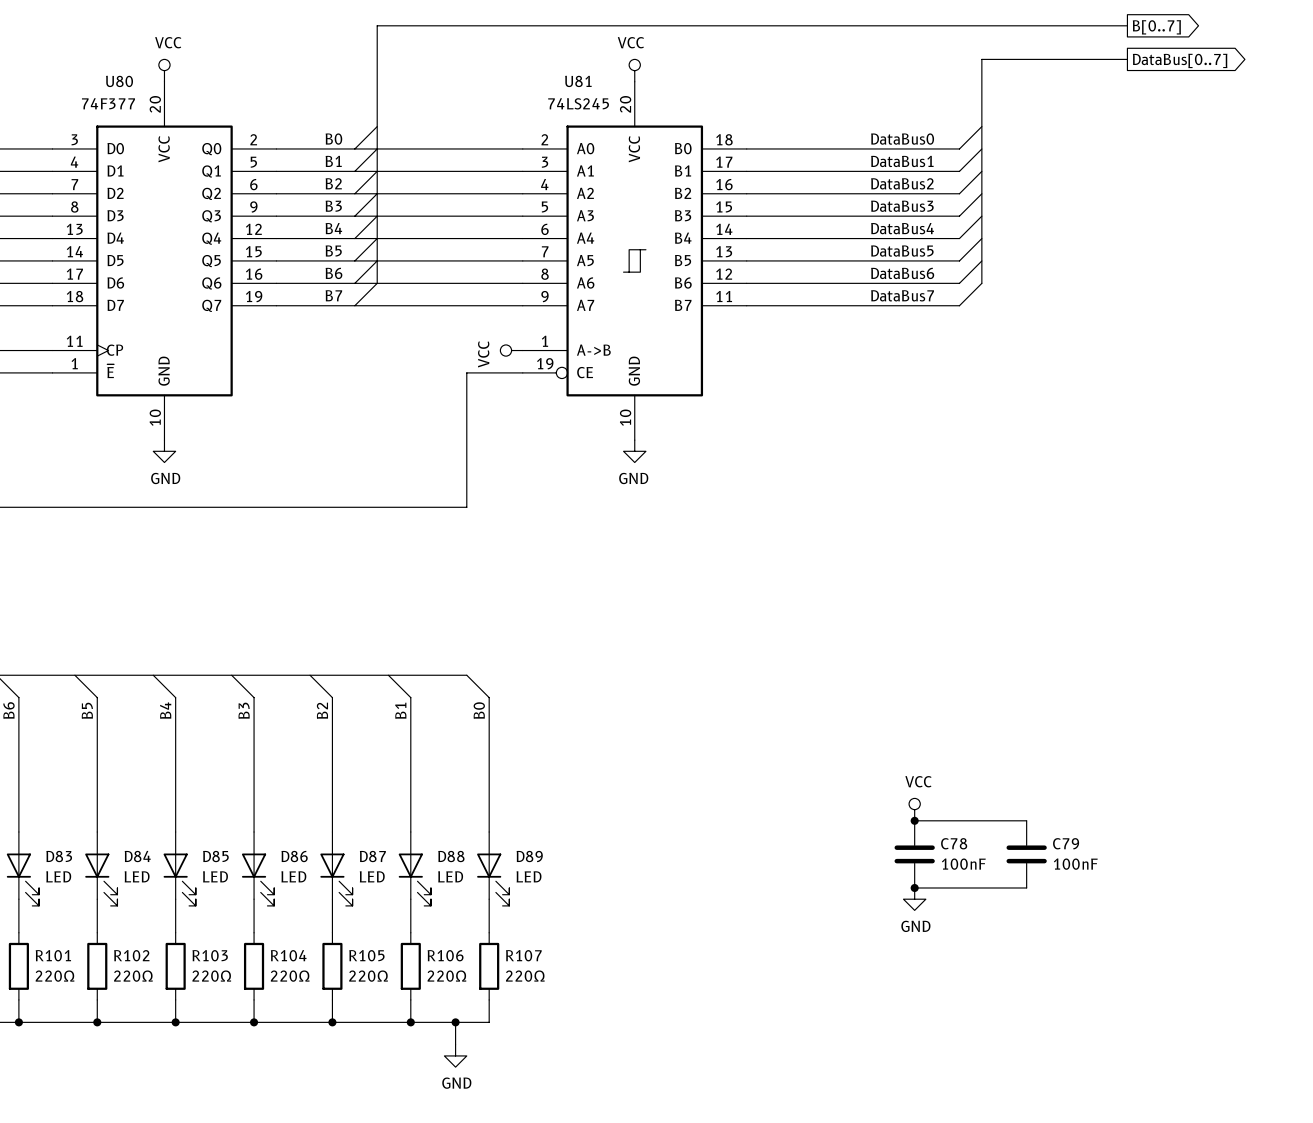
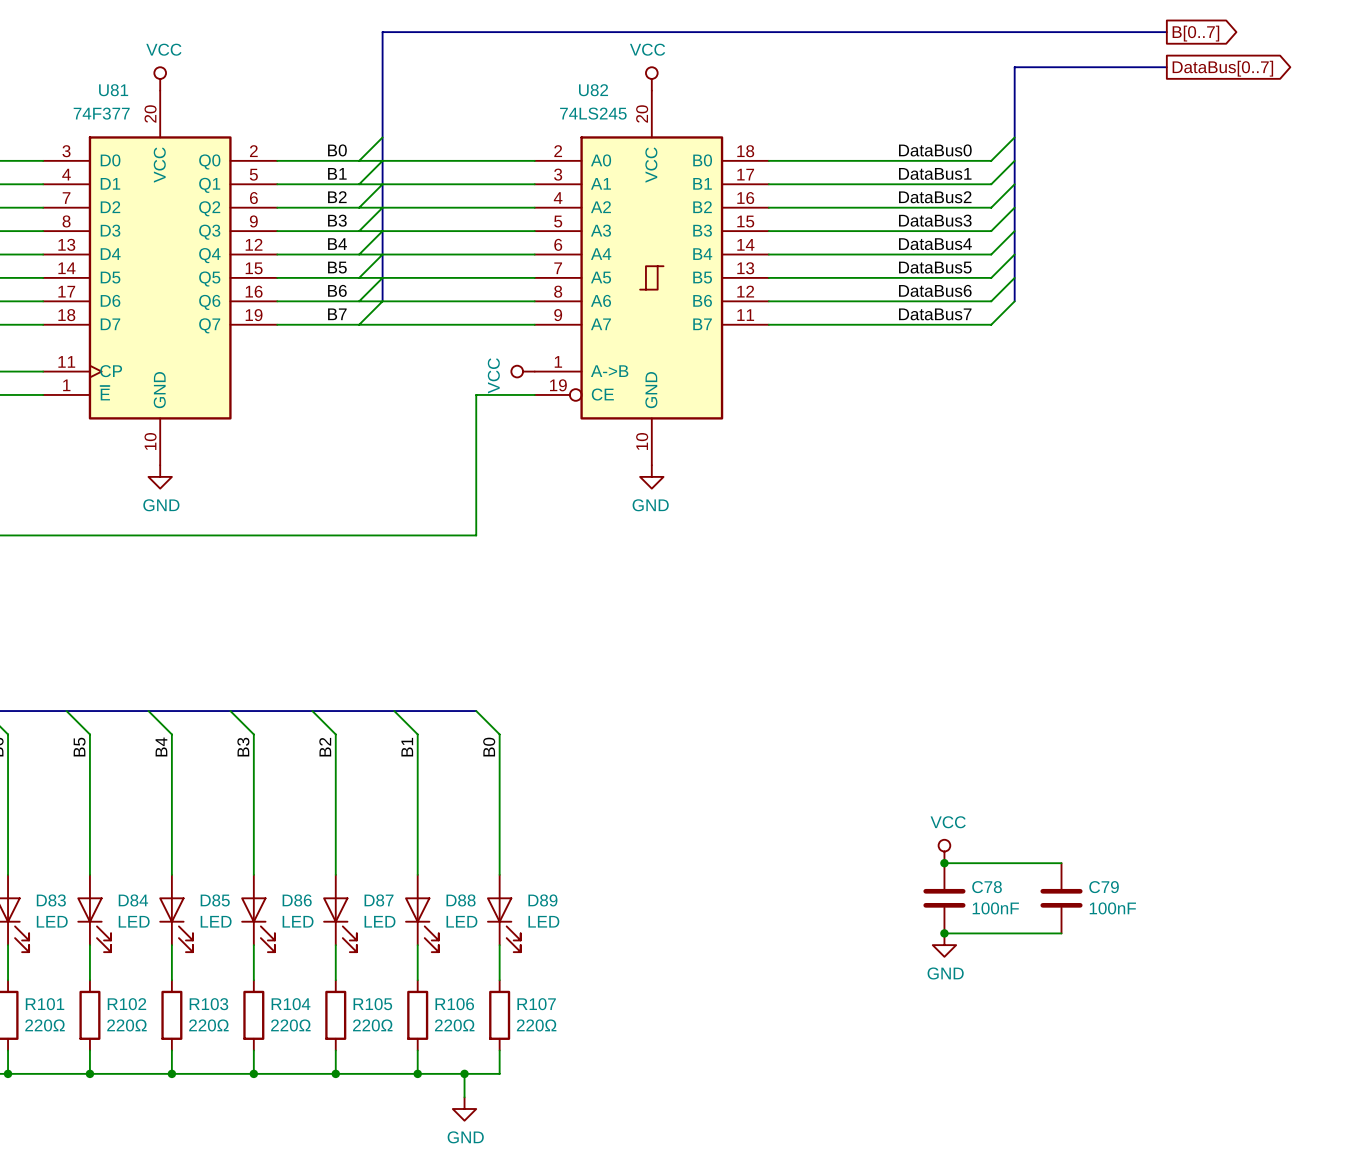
U80 name: U80 (119, 81) -> U81 (113, 90)
U81 name: U81 (578, 81) -> U82 (593, 90)

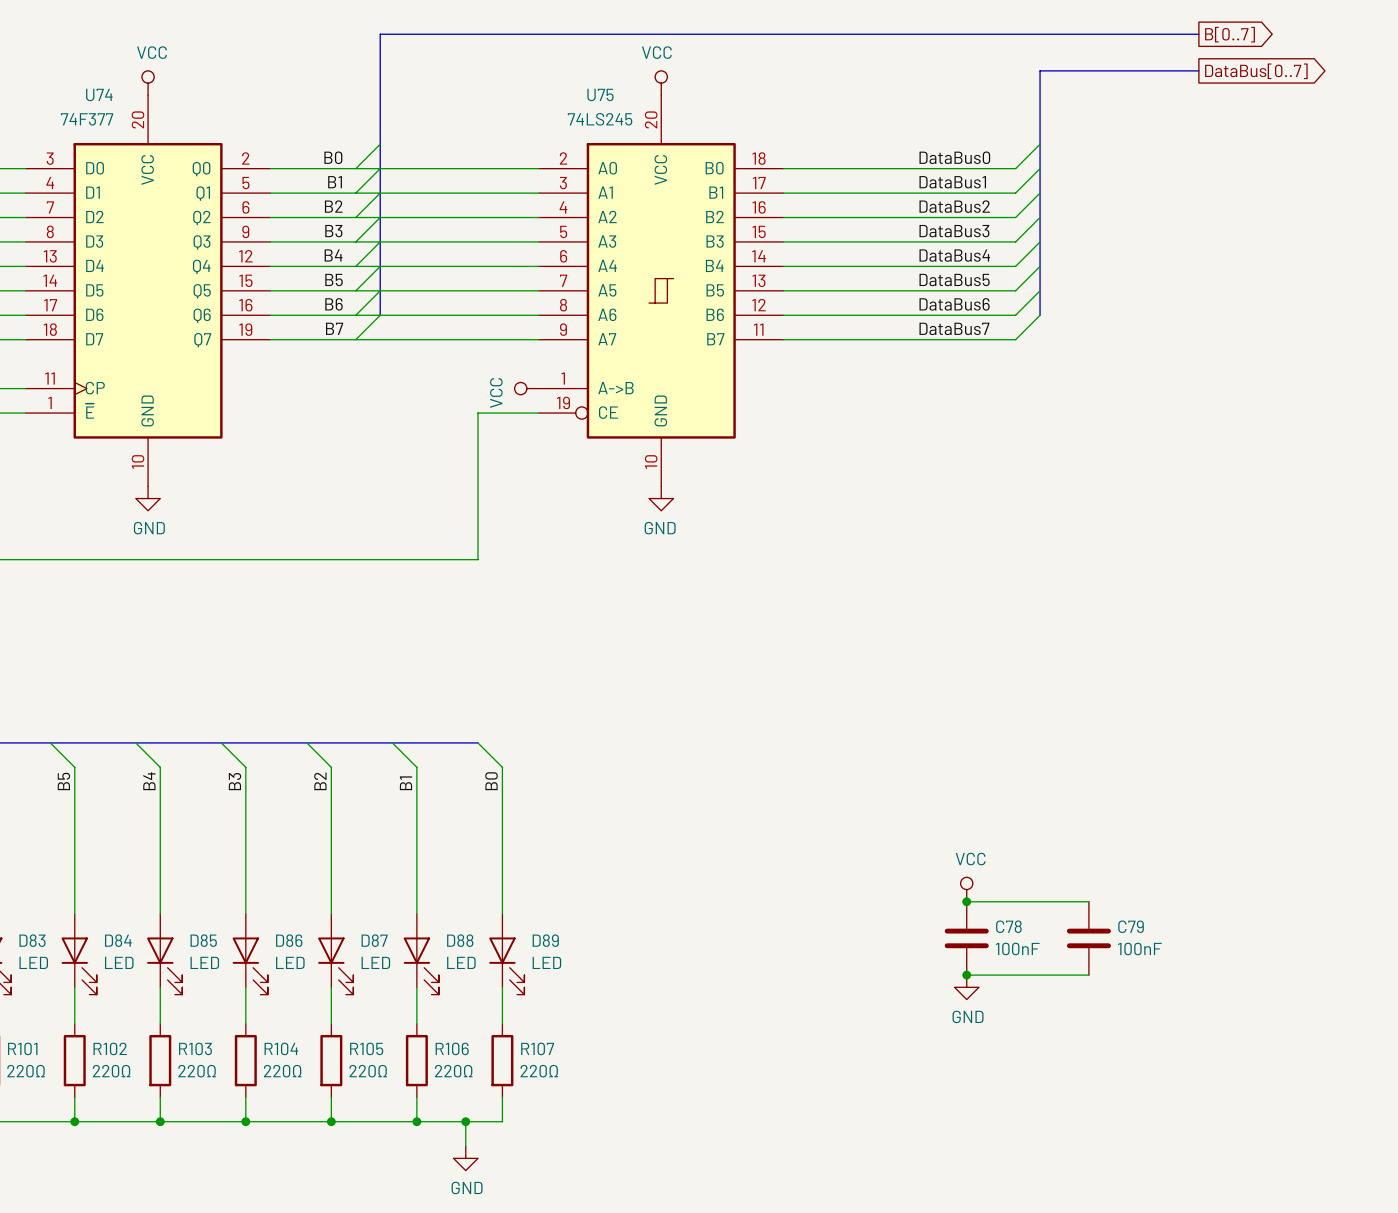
U81 name: U81 (113, 90) -> U74 (99, 94)
U82 name: U82 (593, 90) -> U75 (600, 94)

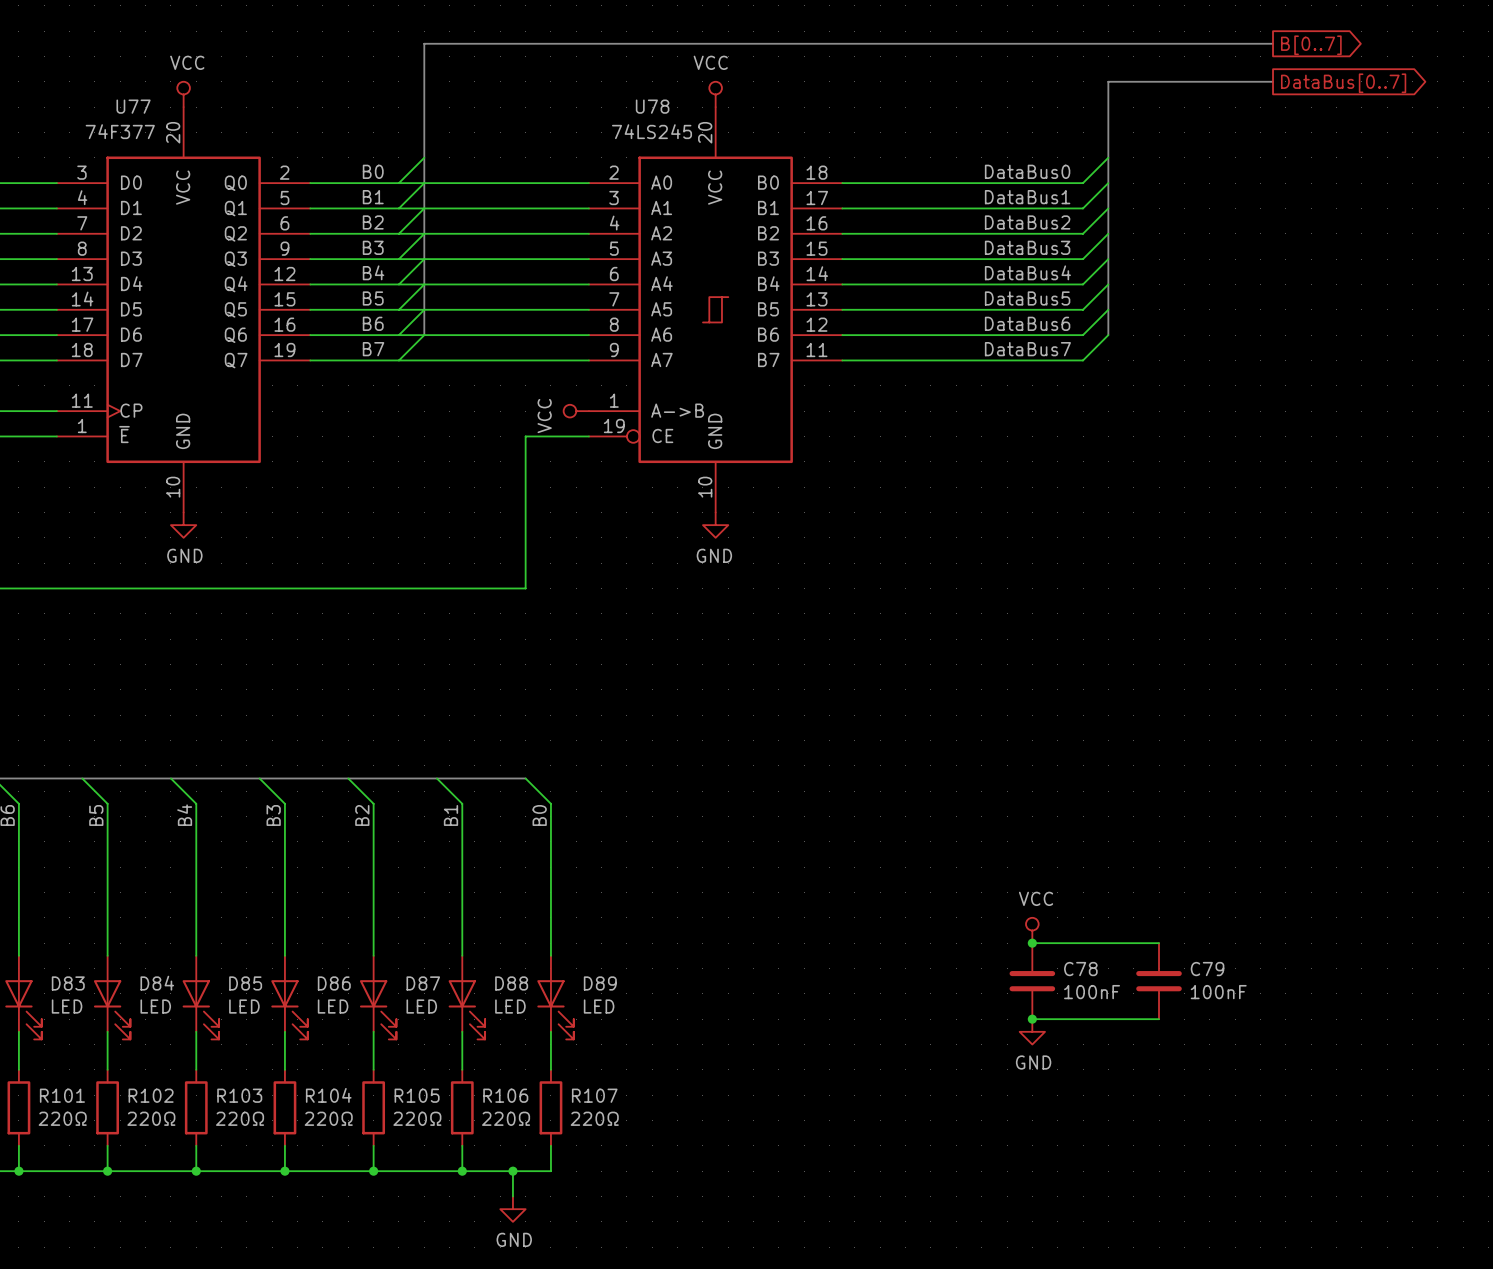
U74 name: U74 (99, 94) -> U77 (133, 106)
U75 name: U75 (600, 94) -> U78 (652, 106)

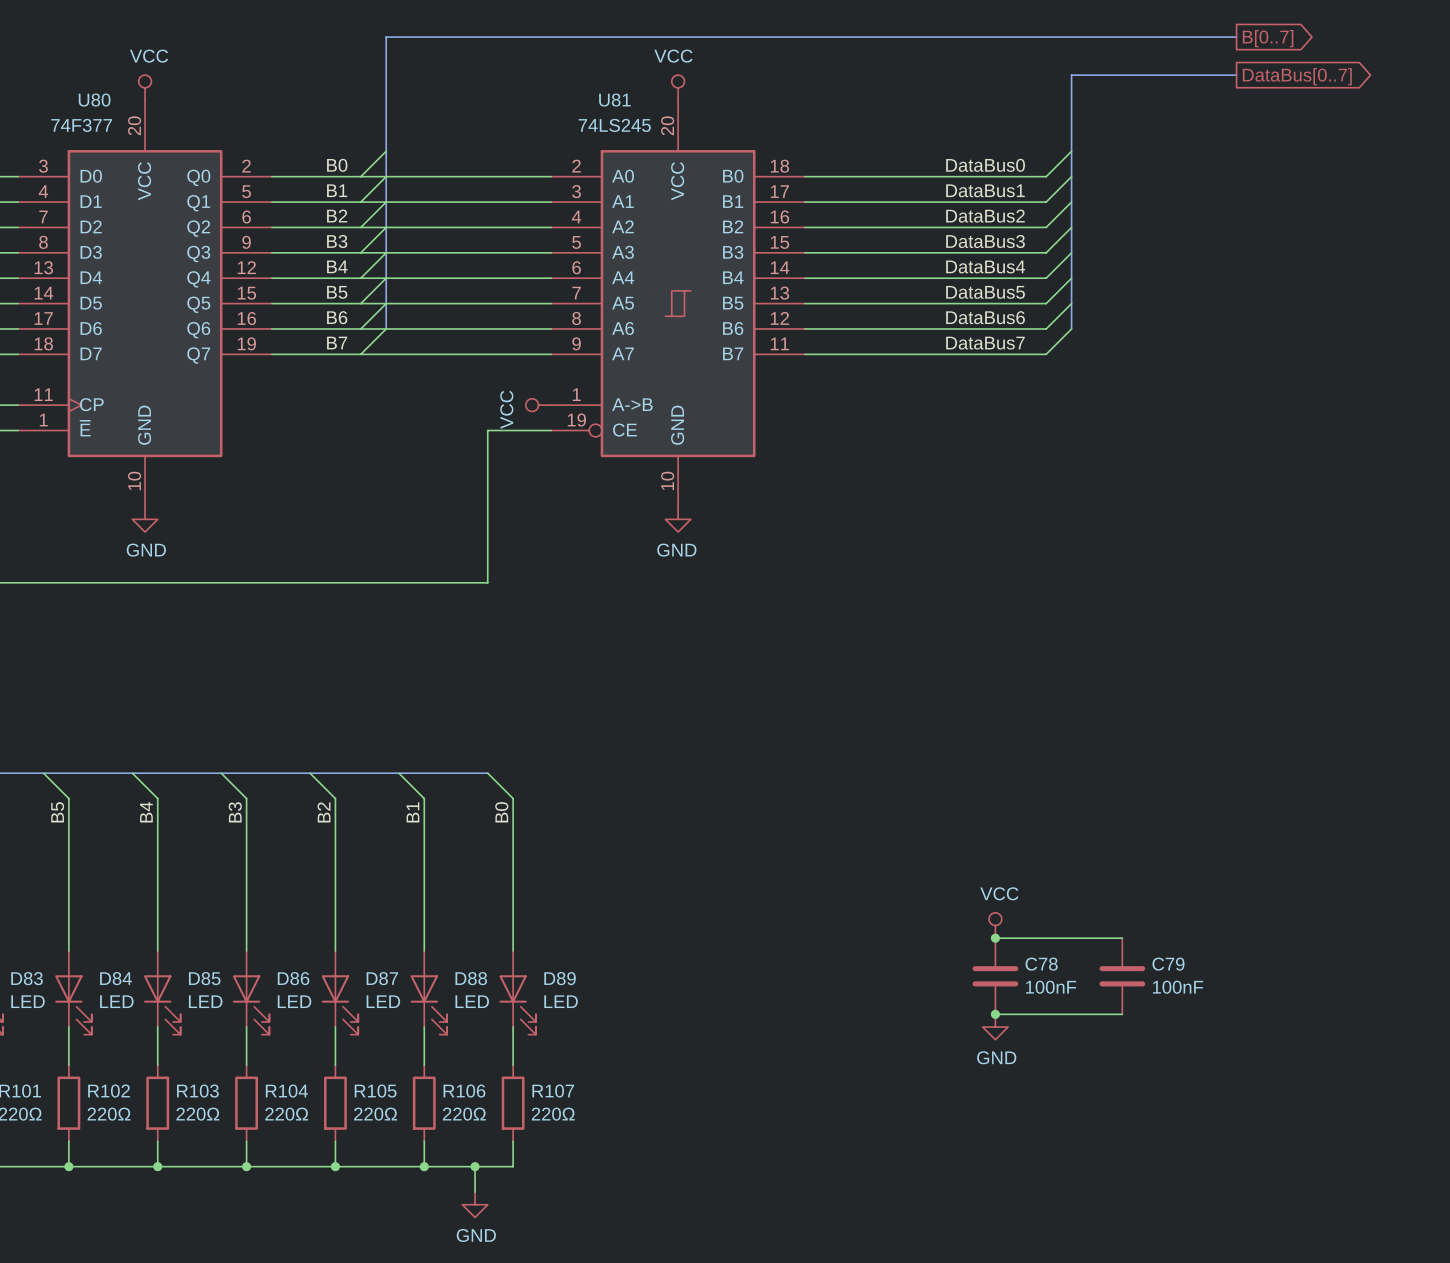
U77 name: U77 (133, 106) -> U80 (94, 100)
U78 name: U78 (652, 106) -> U81 (614, 100)

